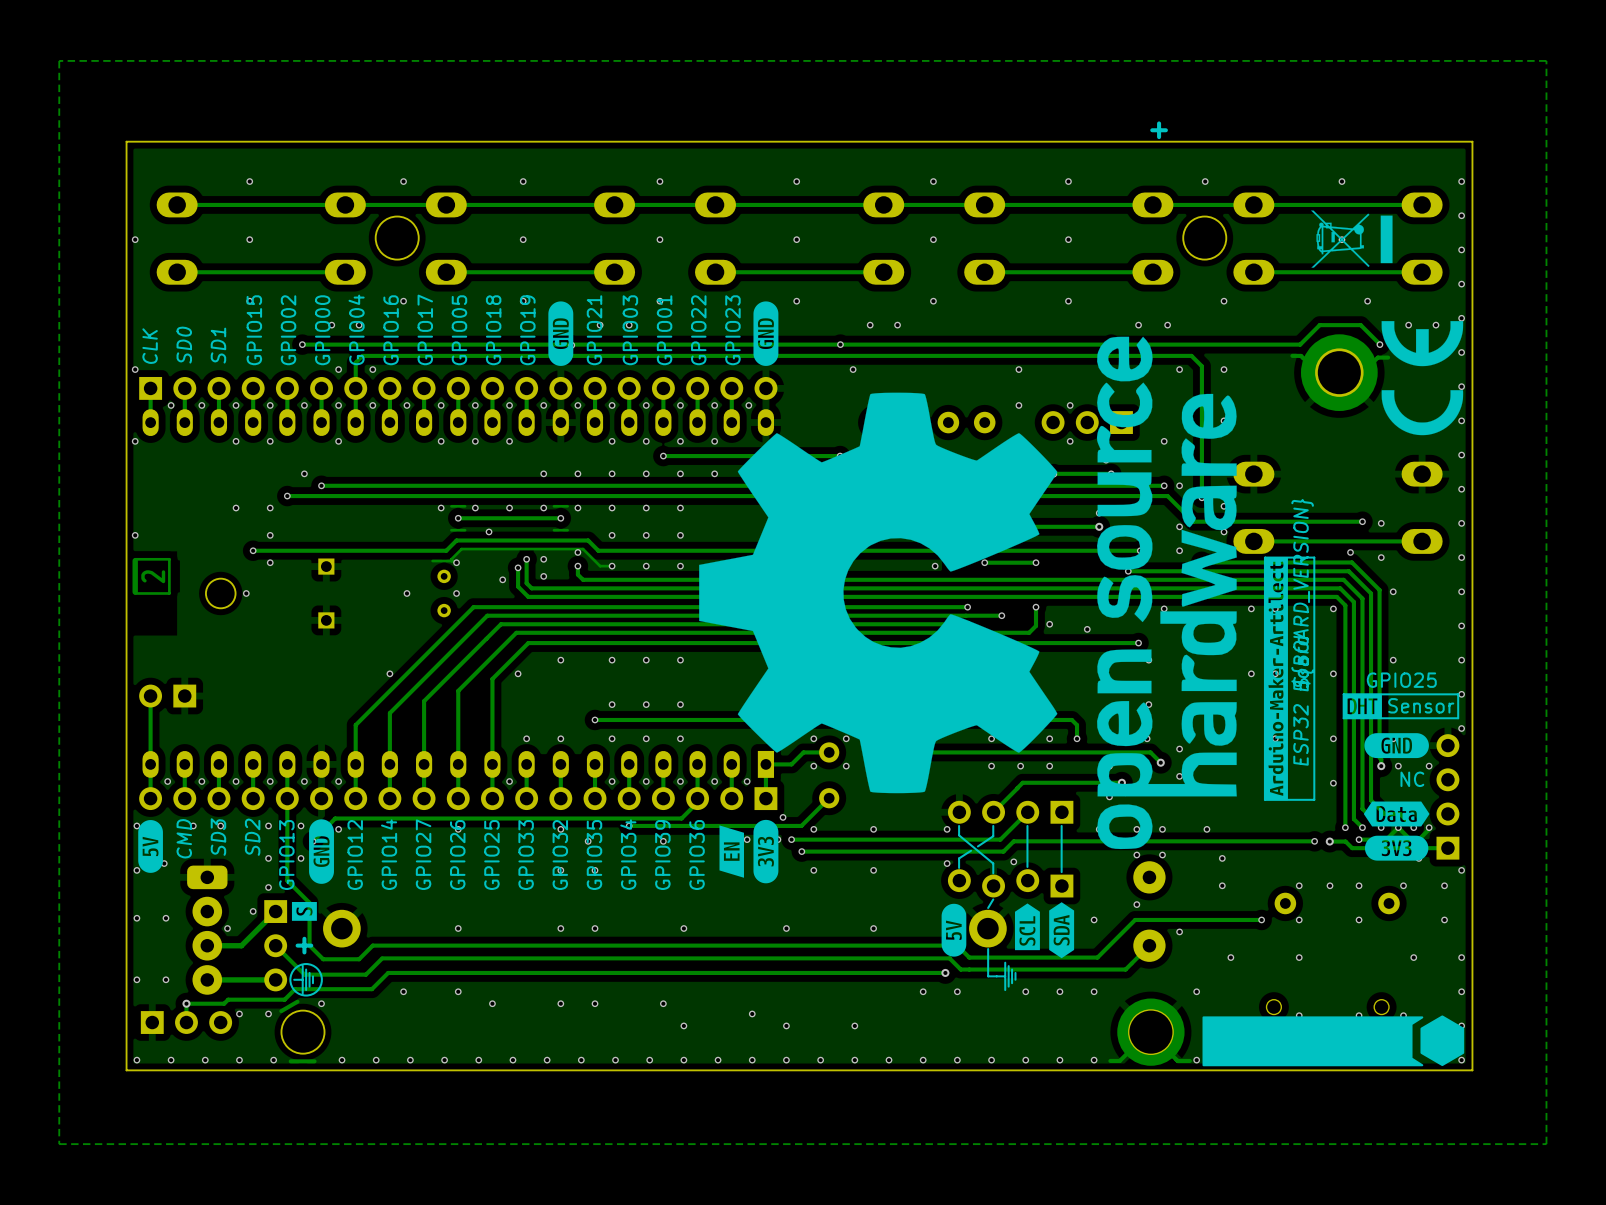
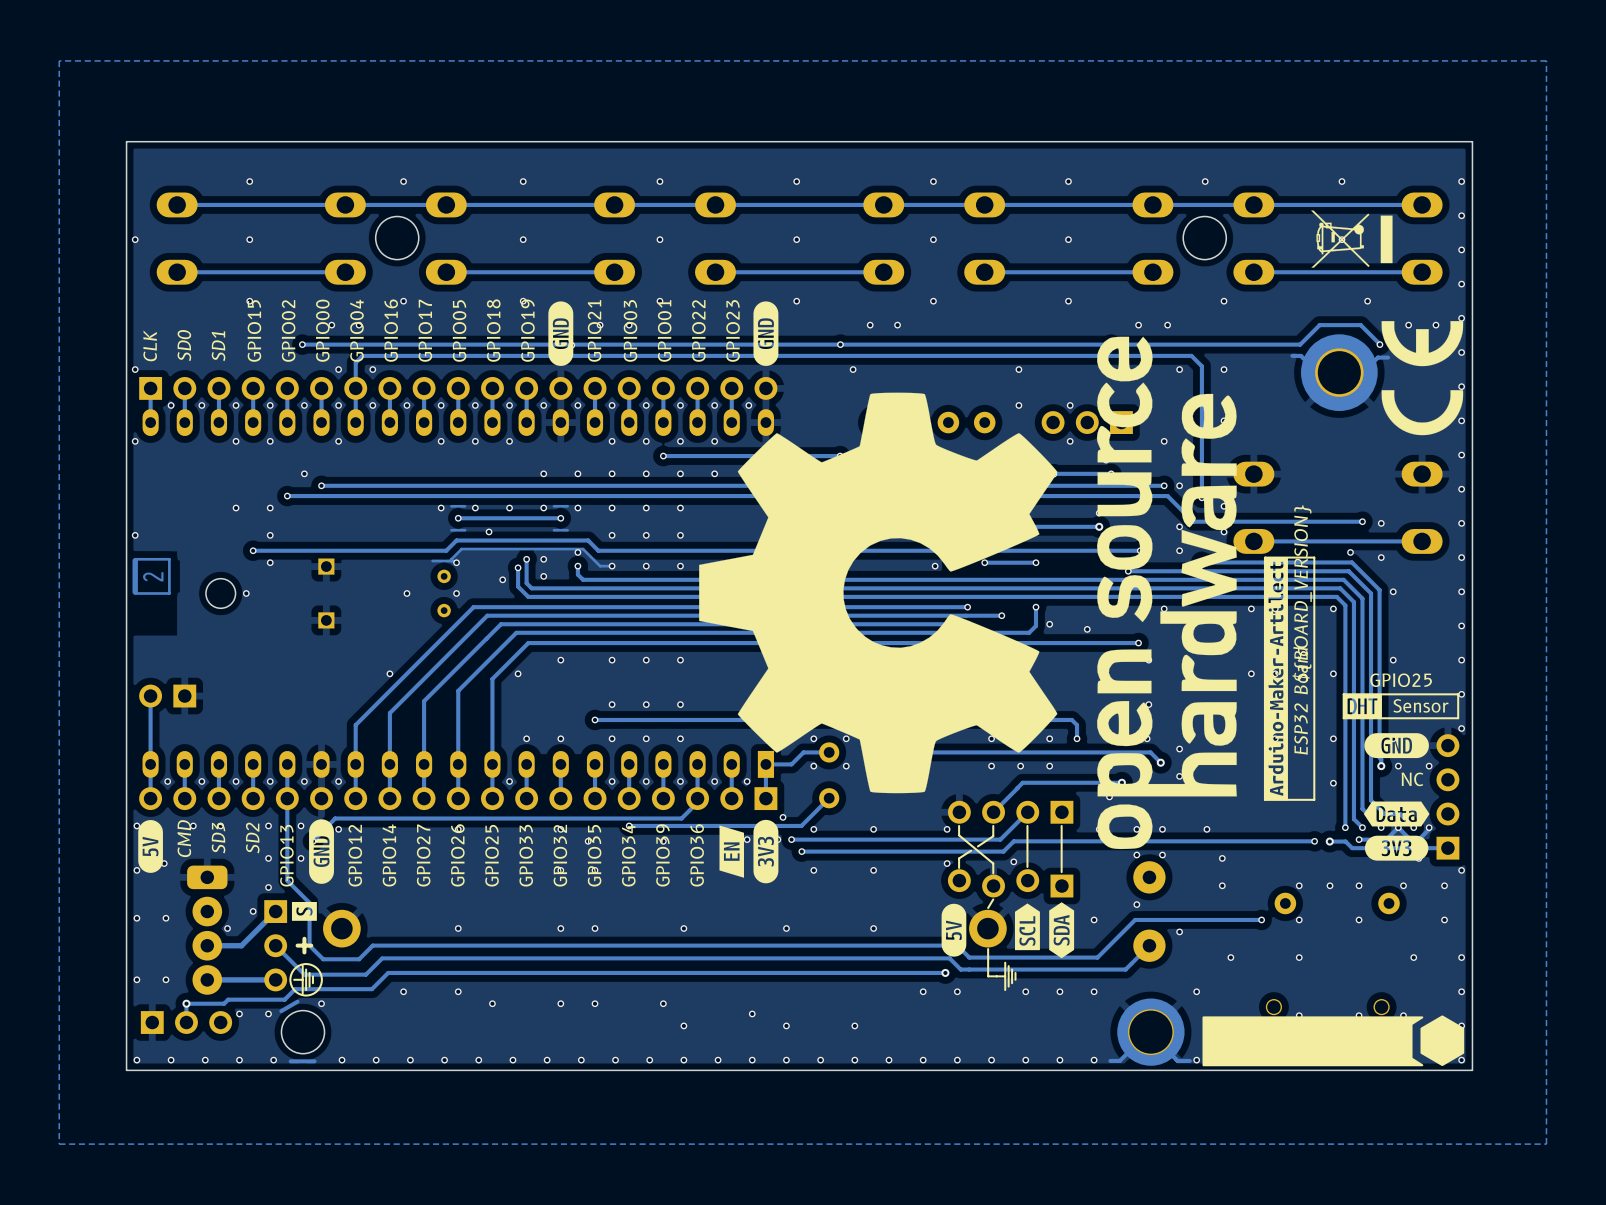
line: (1159, 123) (1159, 137) -> none
line: (1165, 130) (1152, 130) -> none

